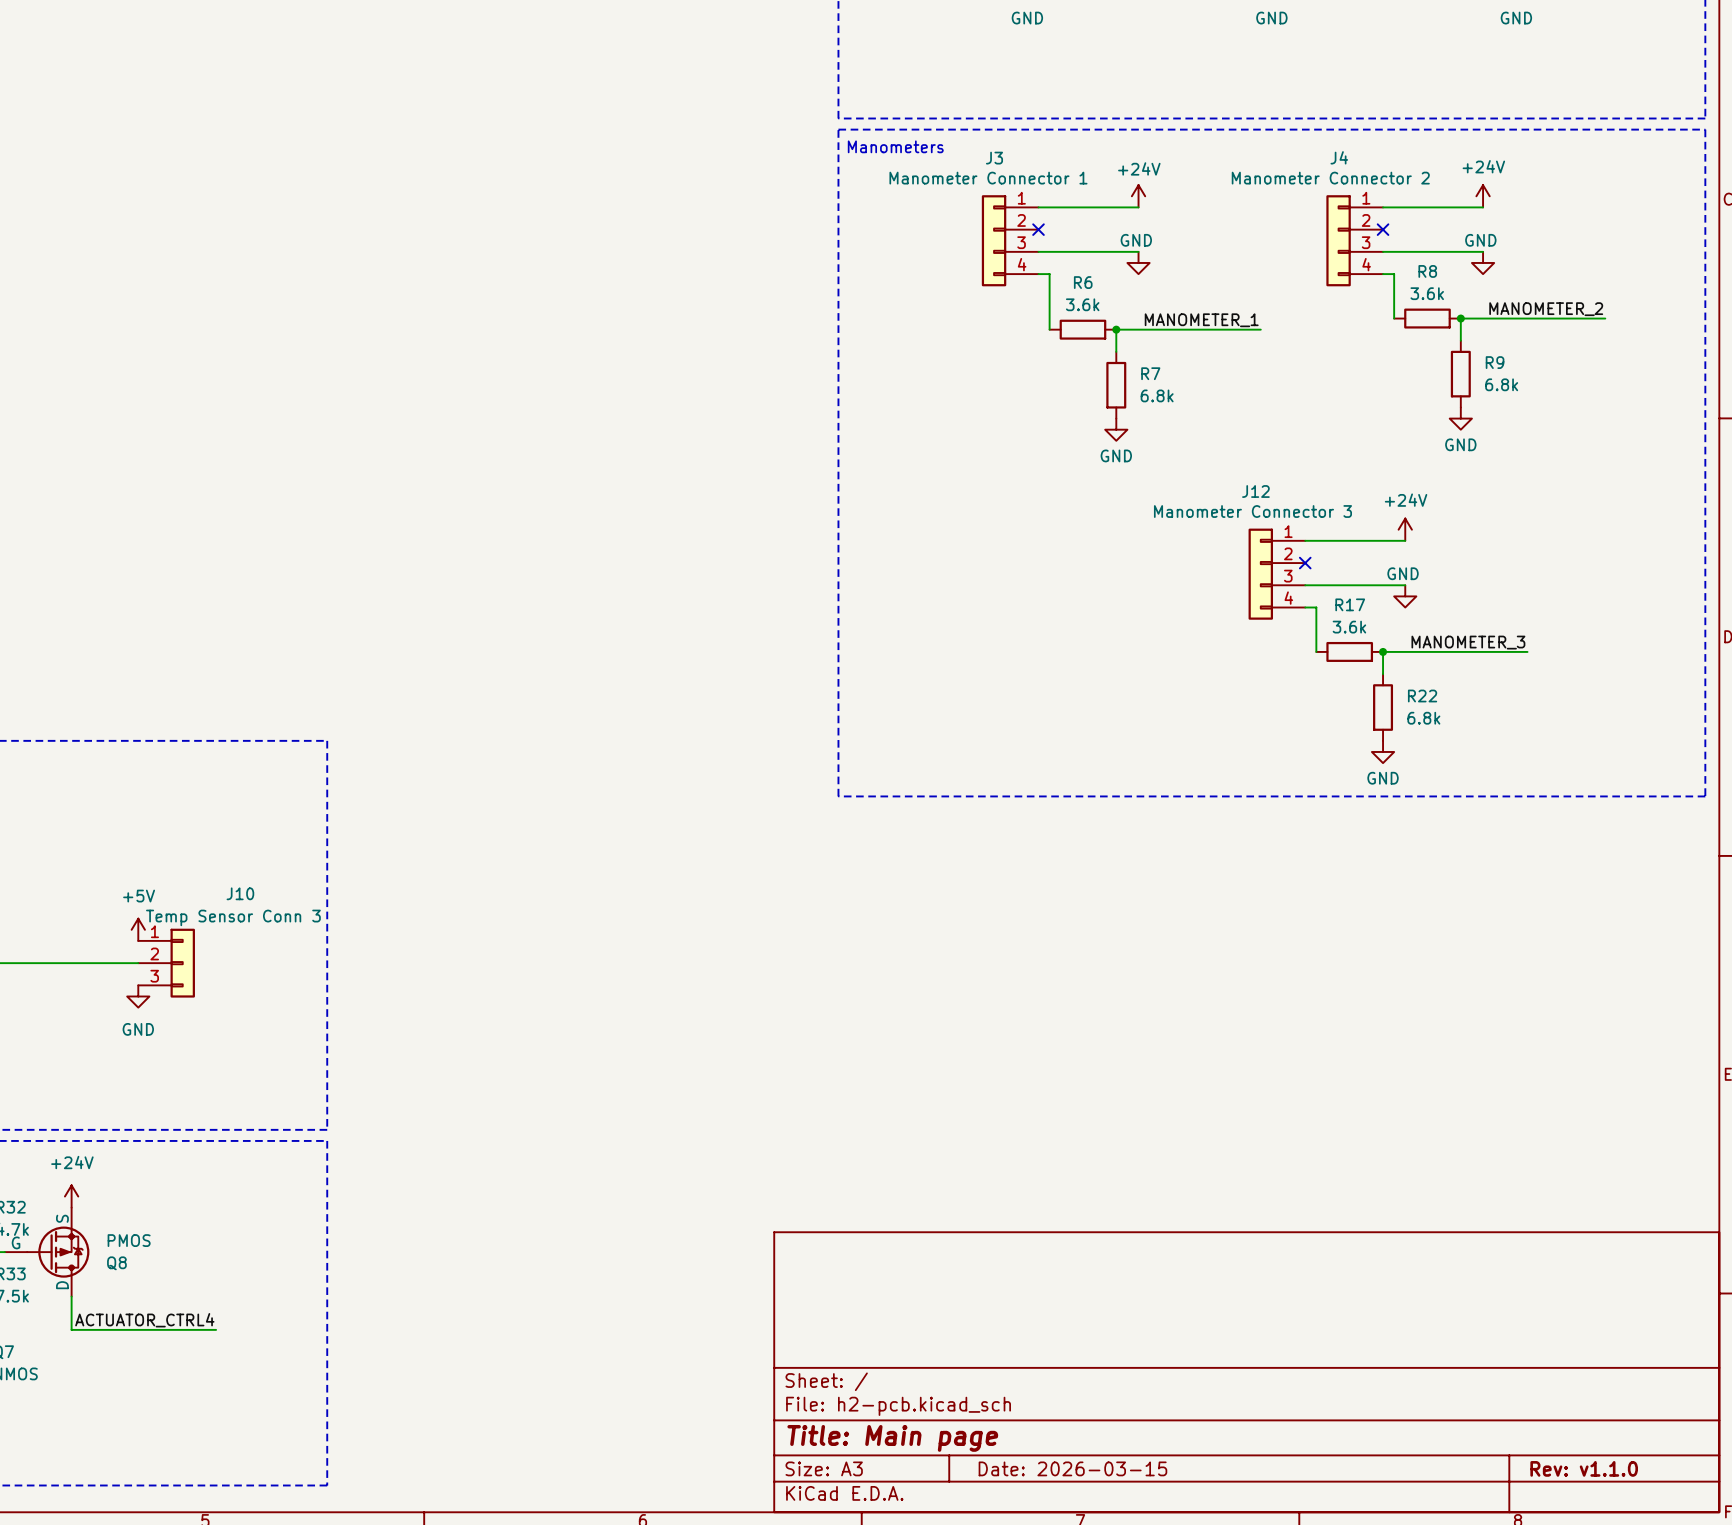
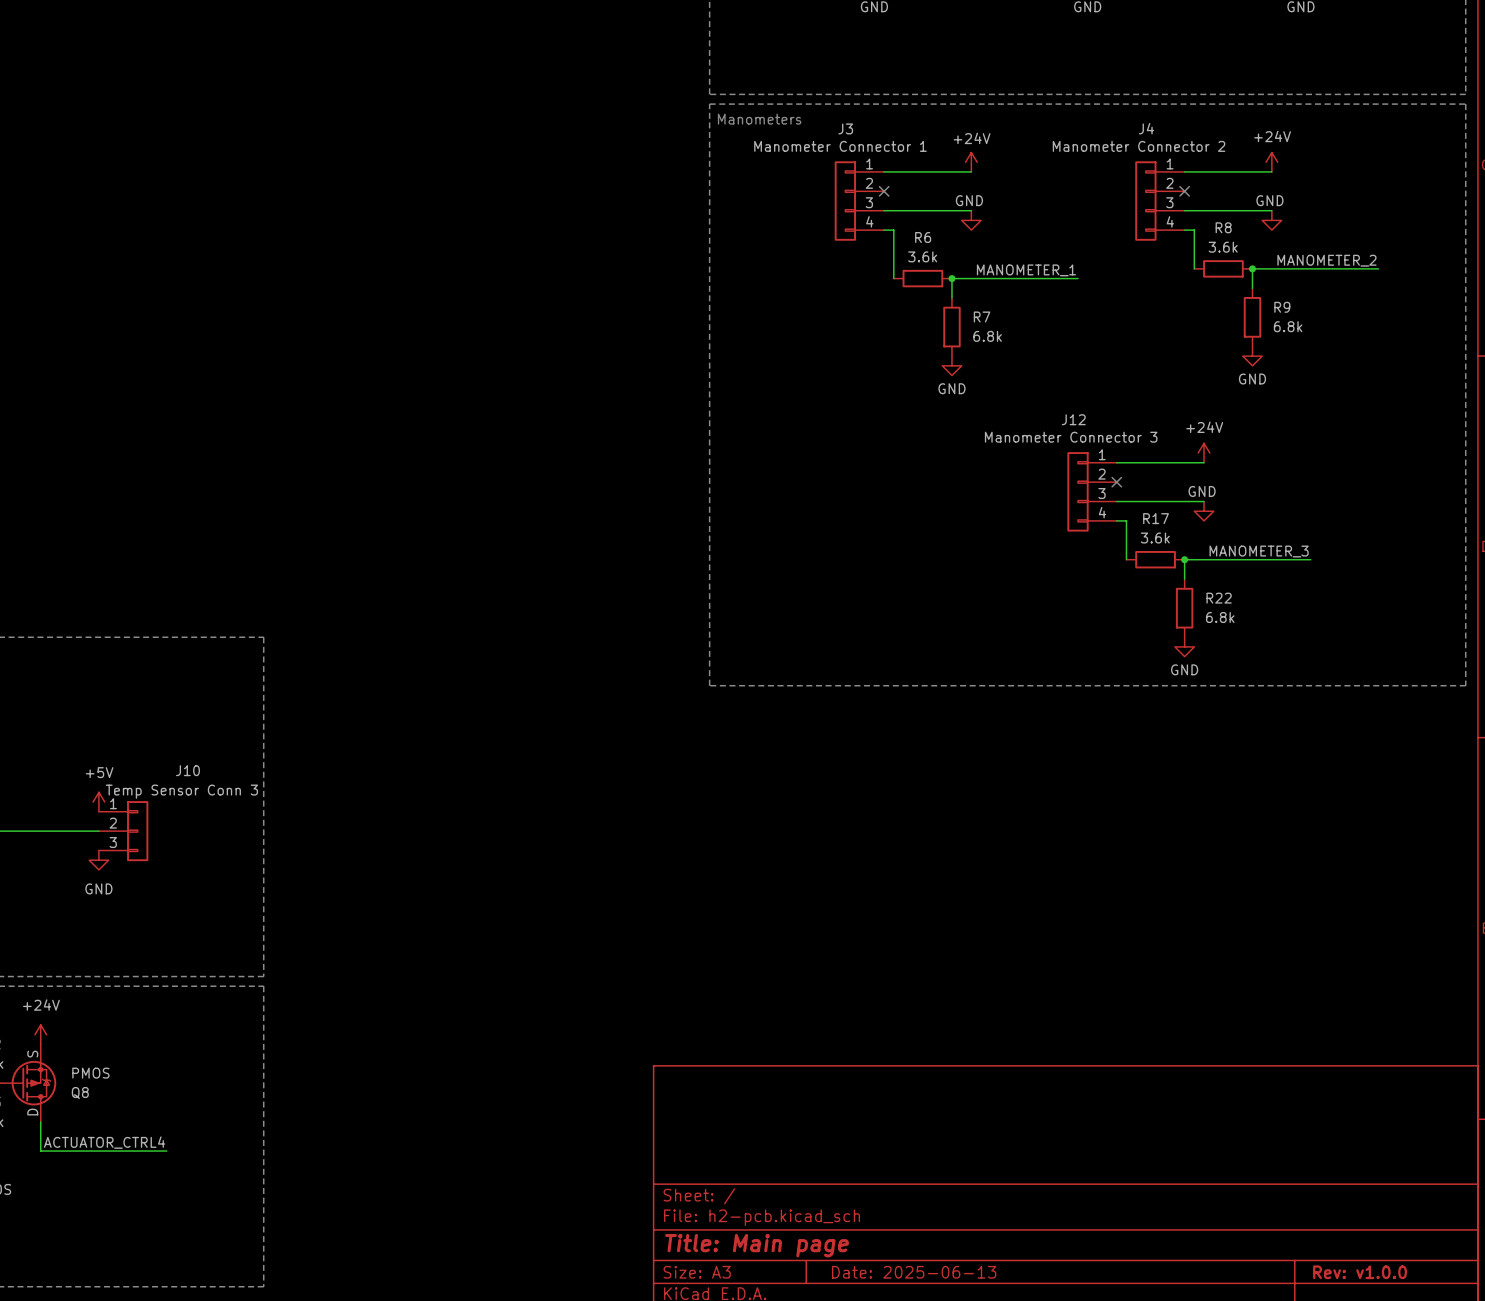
title block: Date: 2026-03-15 (1072, 1468) -> Date: 2025-06-13 (914, 1272)
title block: Rev: v1.1.0 (1584, 1468) -> Rev: v1.0.0 (1360, 1272)

